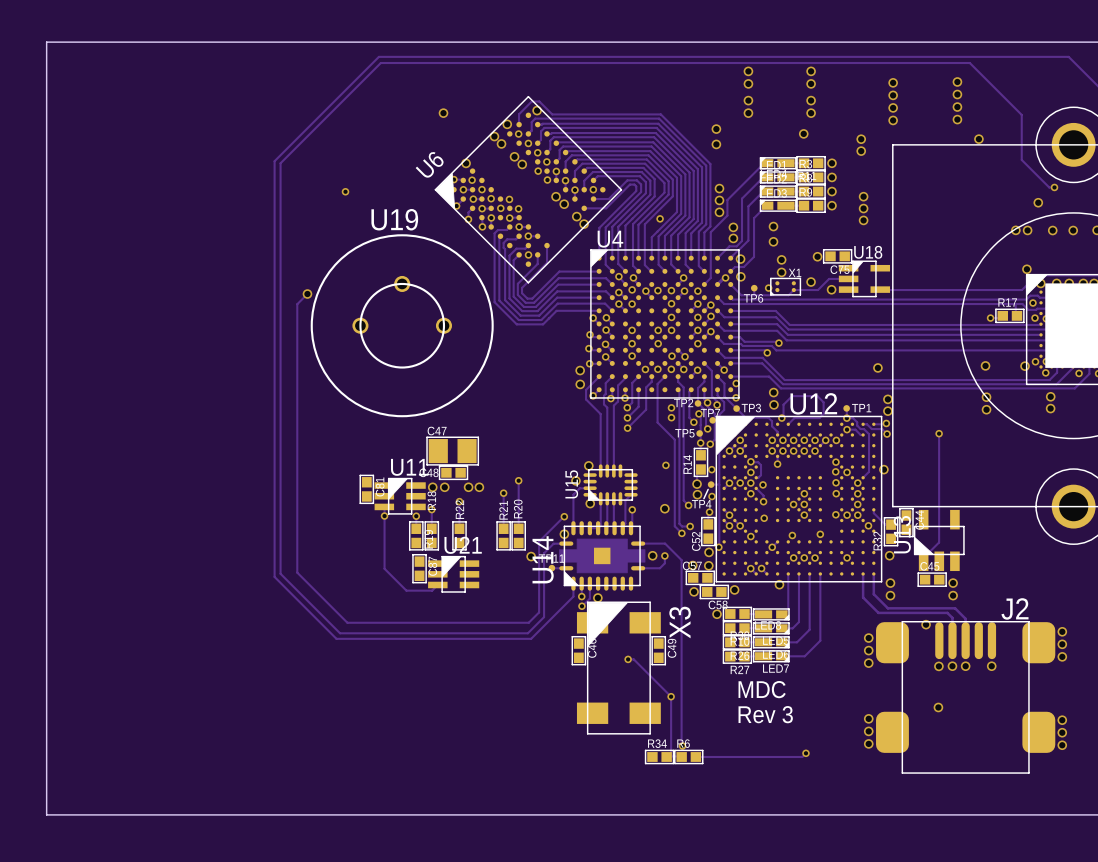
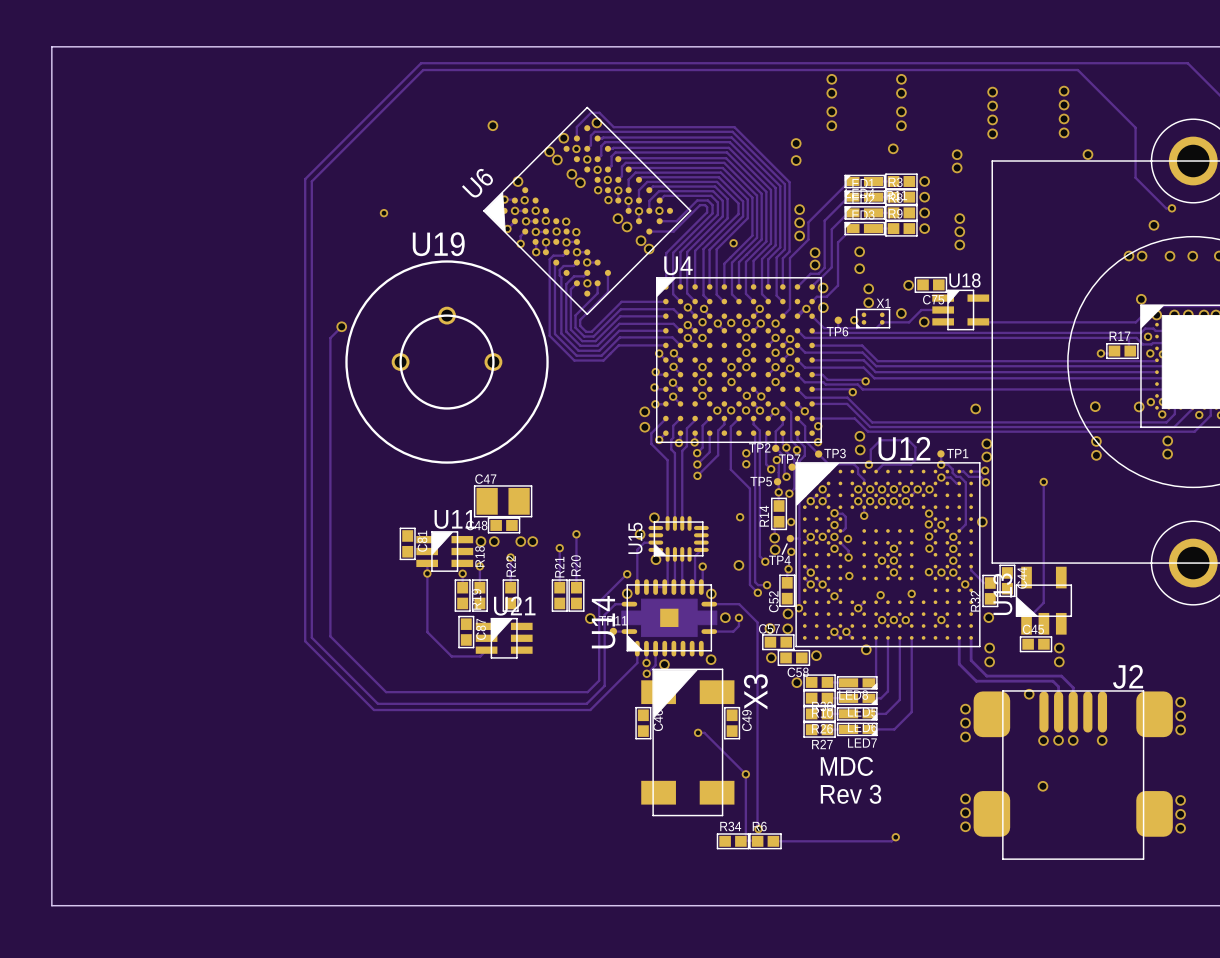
via: none -> (711, 593)
via: none -> (711, 659)

